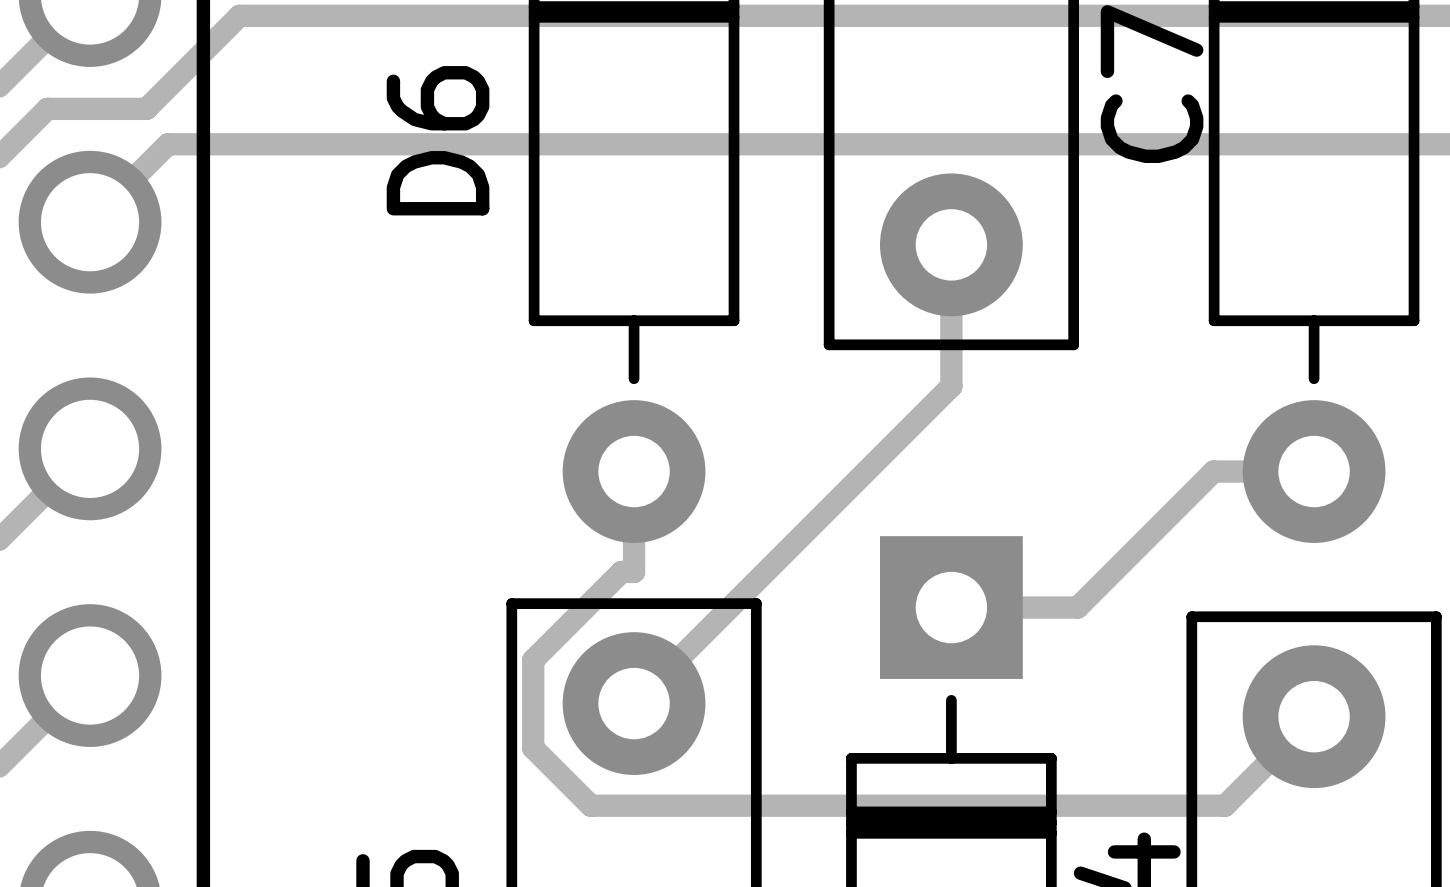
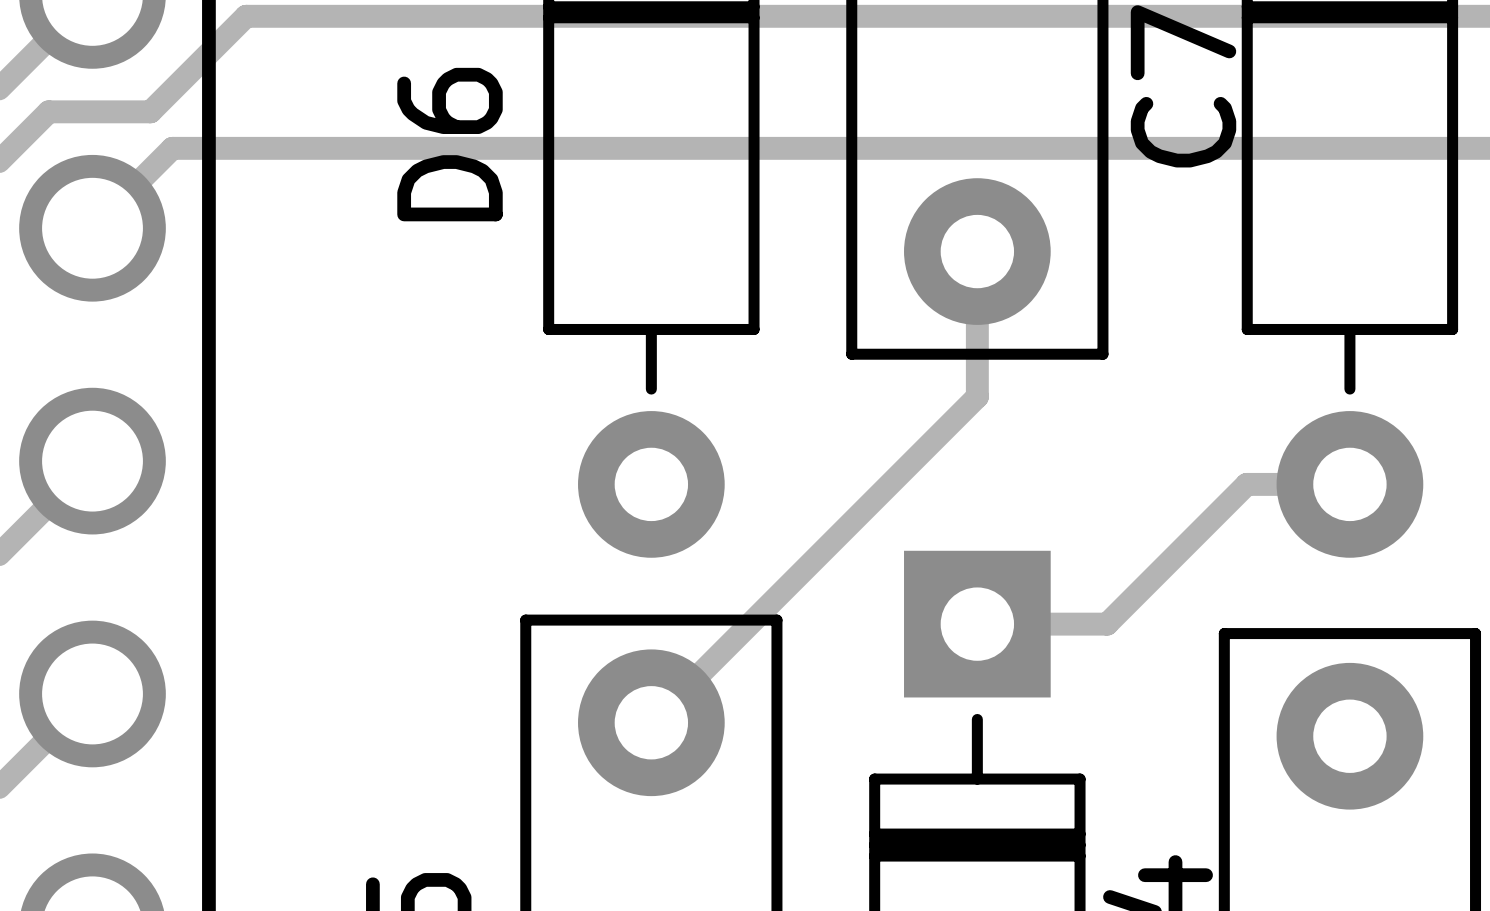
track: (634, 471) (634, 571) (621, 571) (533, 660) (533, 748) (590, 805) (1225, 805) (1314, 716) -> none

